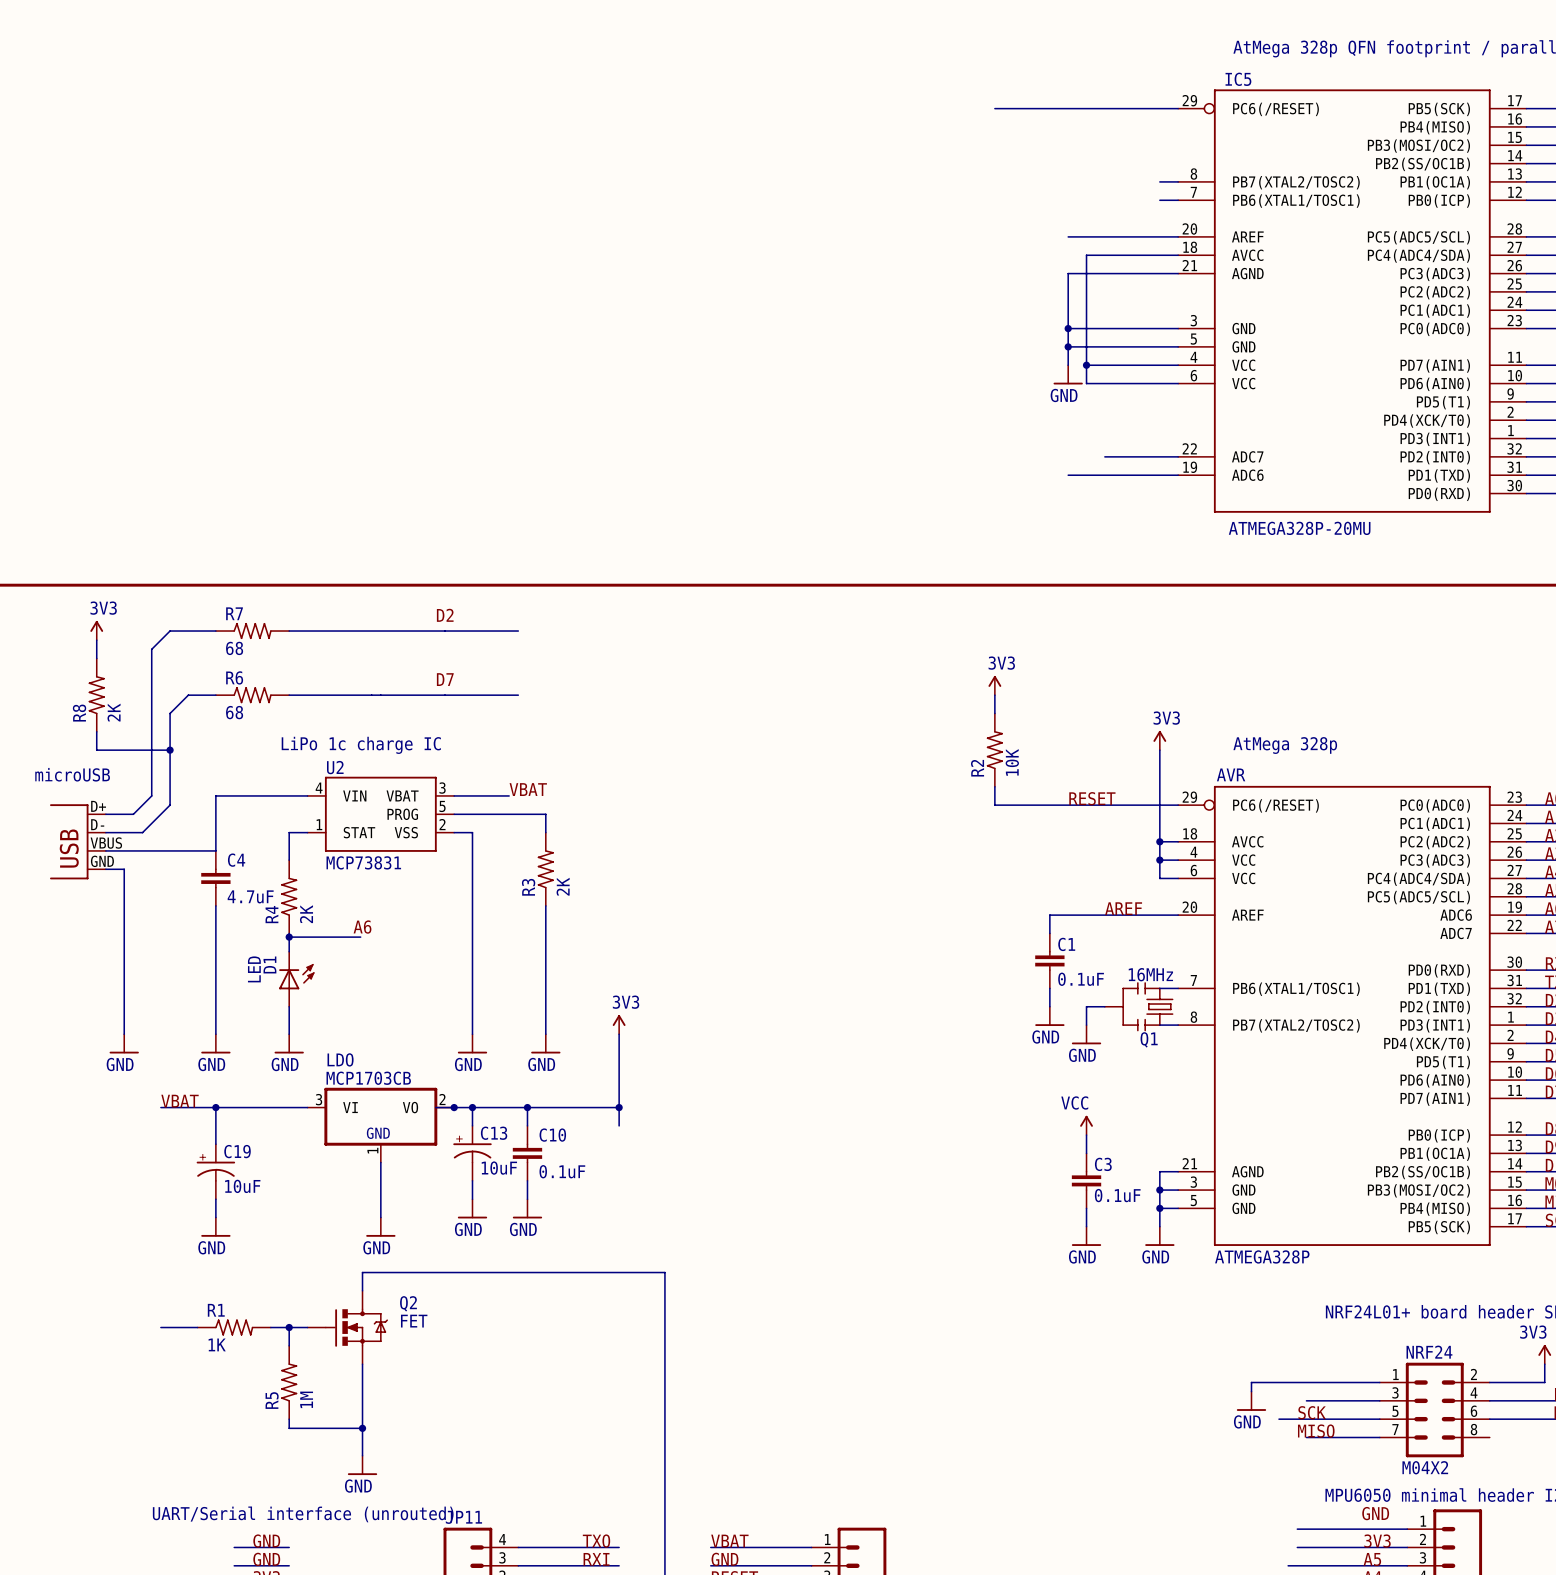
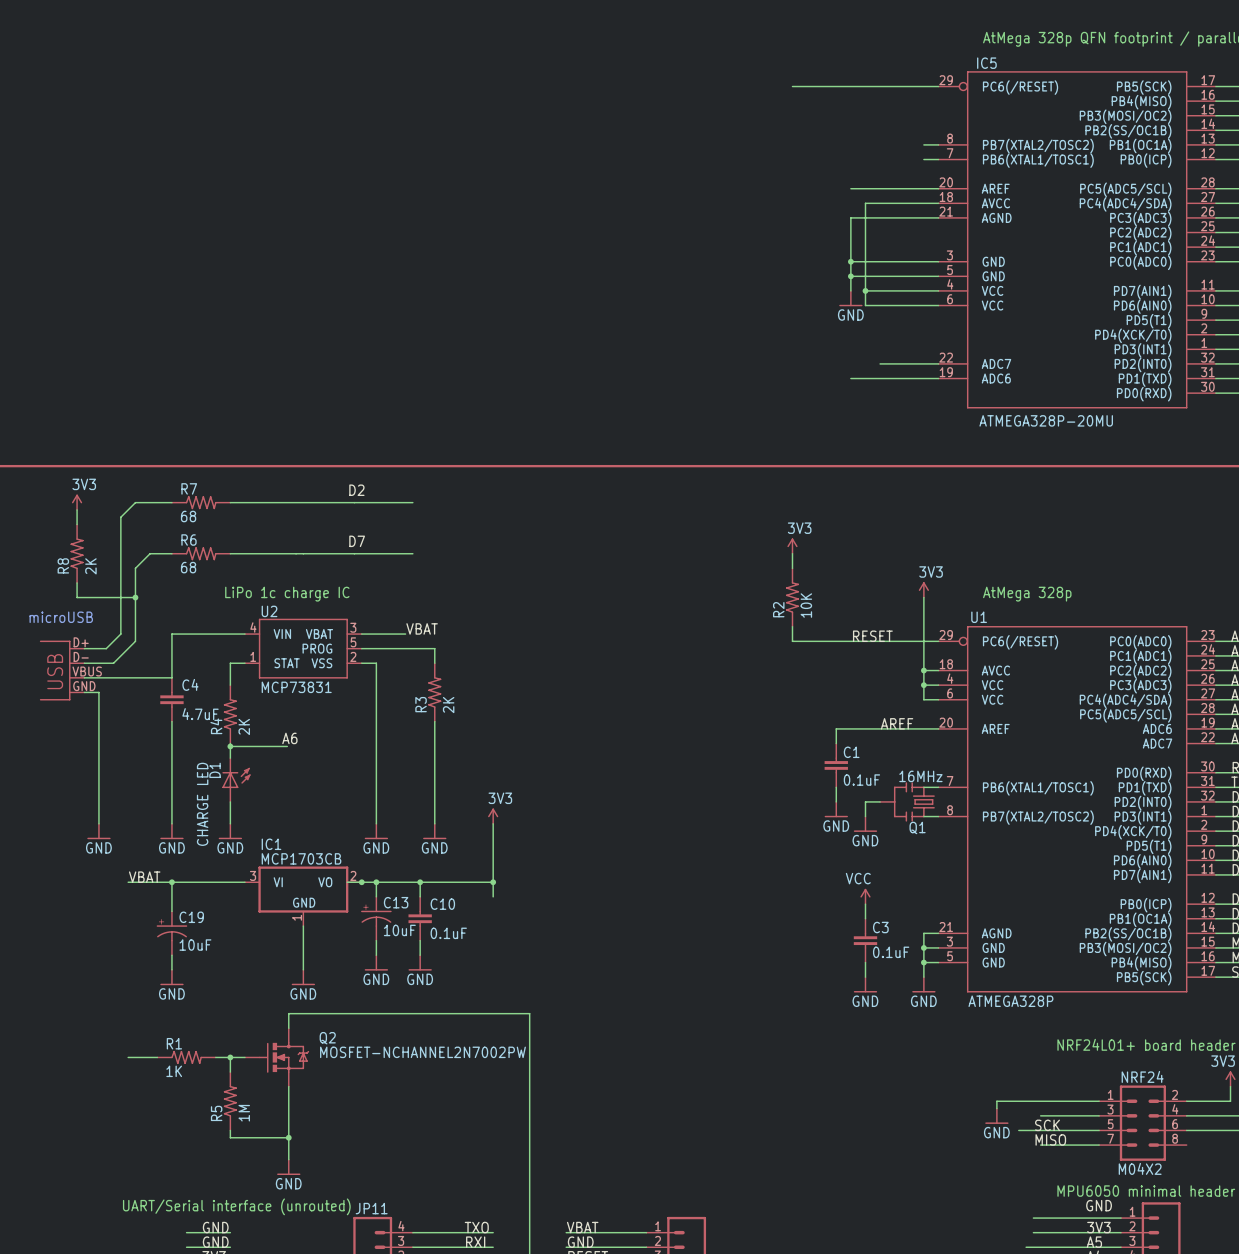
AVR name: AVR (1231, 774) -> U1 (979, 617)
D1 value: LED (254, 969) -> CHARGE LED (202, 804)
LDO name: LDO (340, 1059) -> IC1 (271, 844)
Q2 value: FET (414, 1321) -> MOSFET-NCHANNEL2N7002PW (422, 1052)

